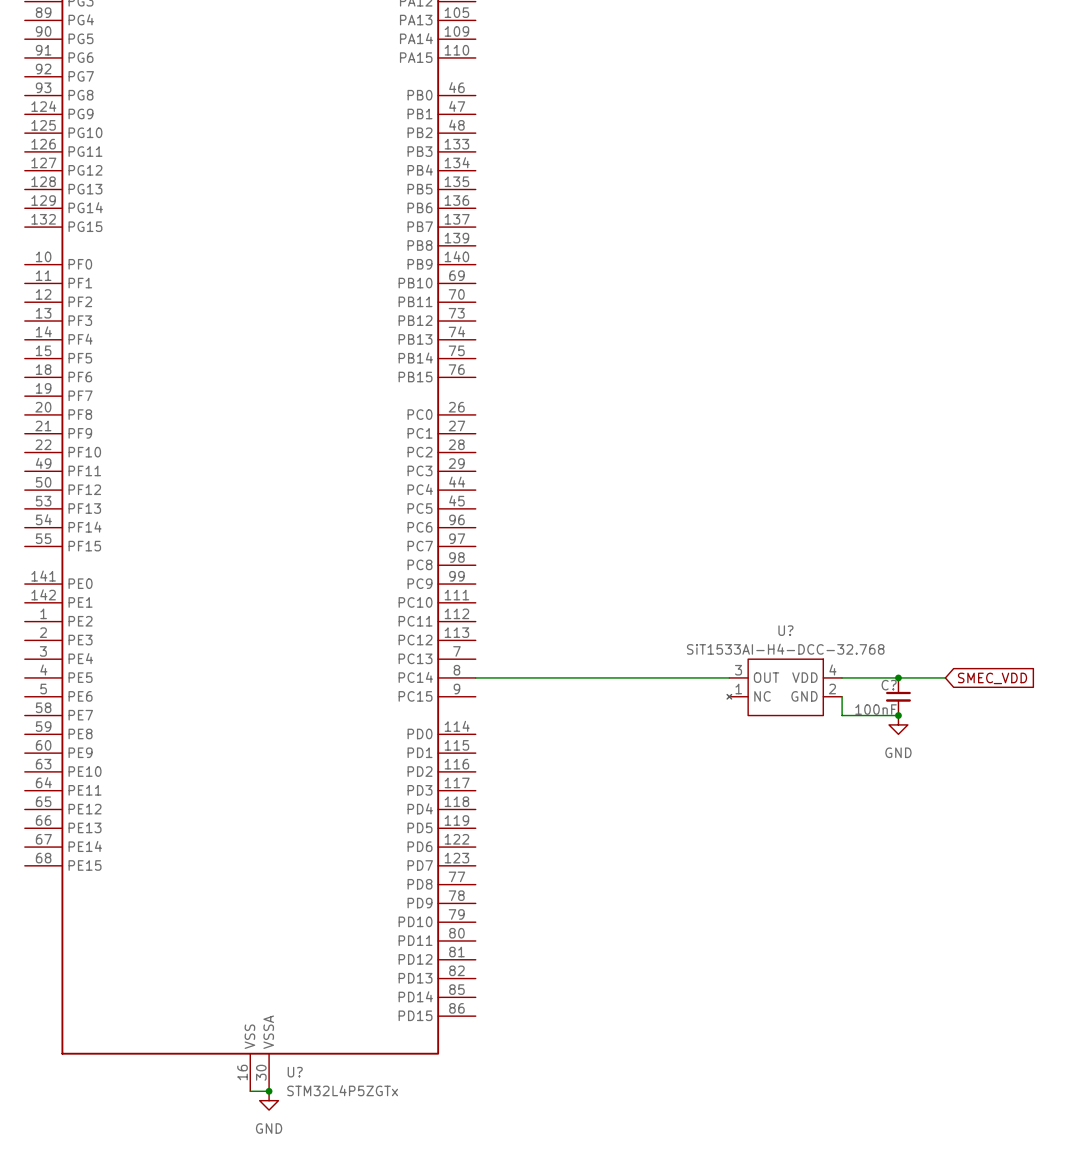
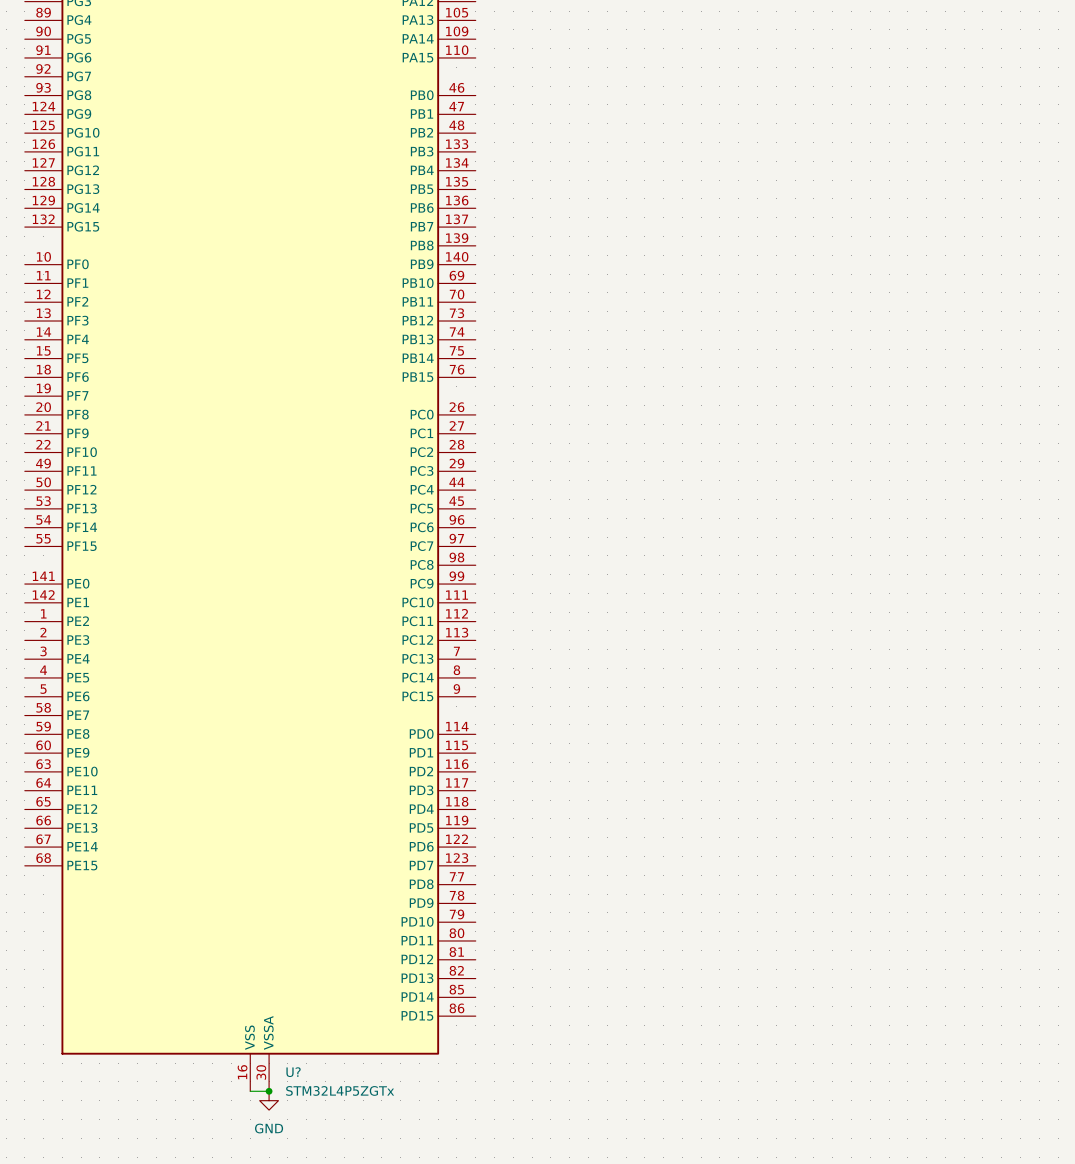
wire: (475, 677) (729, 677) -> none
wire: (842, 677) (945, 677) -> none
junction: (898, 677) -> none
global label: SMEC_VDD (992, 678) -> none
U?: SiT1533AI-H4-DCC-32.768 (784, 687) -> none
wire: (842, 696) (842, 715) (898, 715) -> none
C?: 100nF (898, 696) -> none
junction: (898, 715) -> none
power symbol: GND (898, 724) -> none

